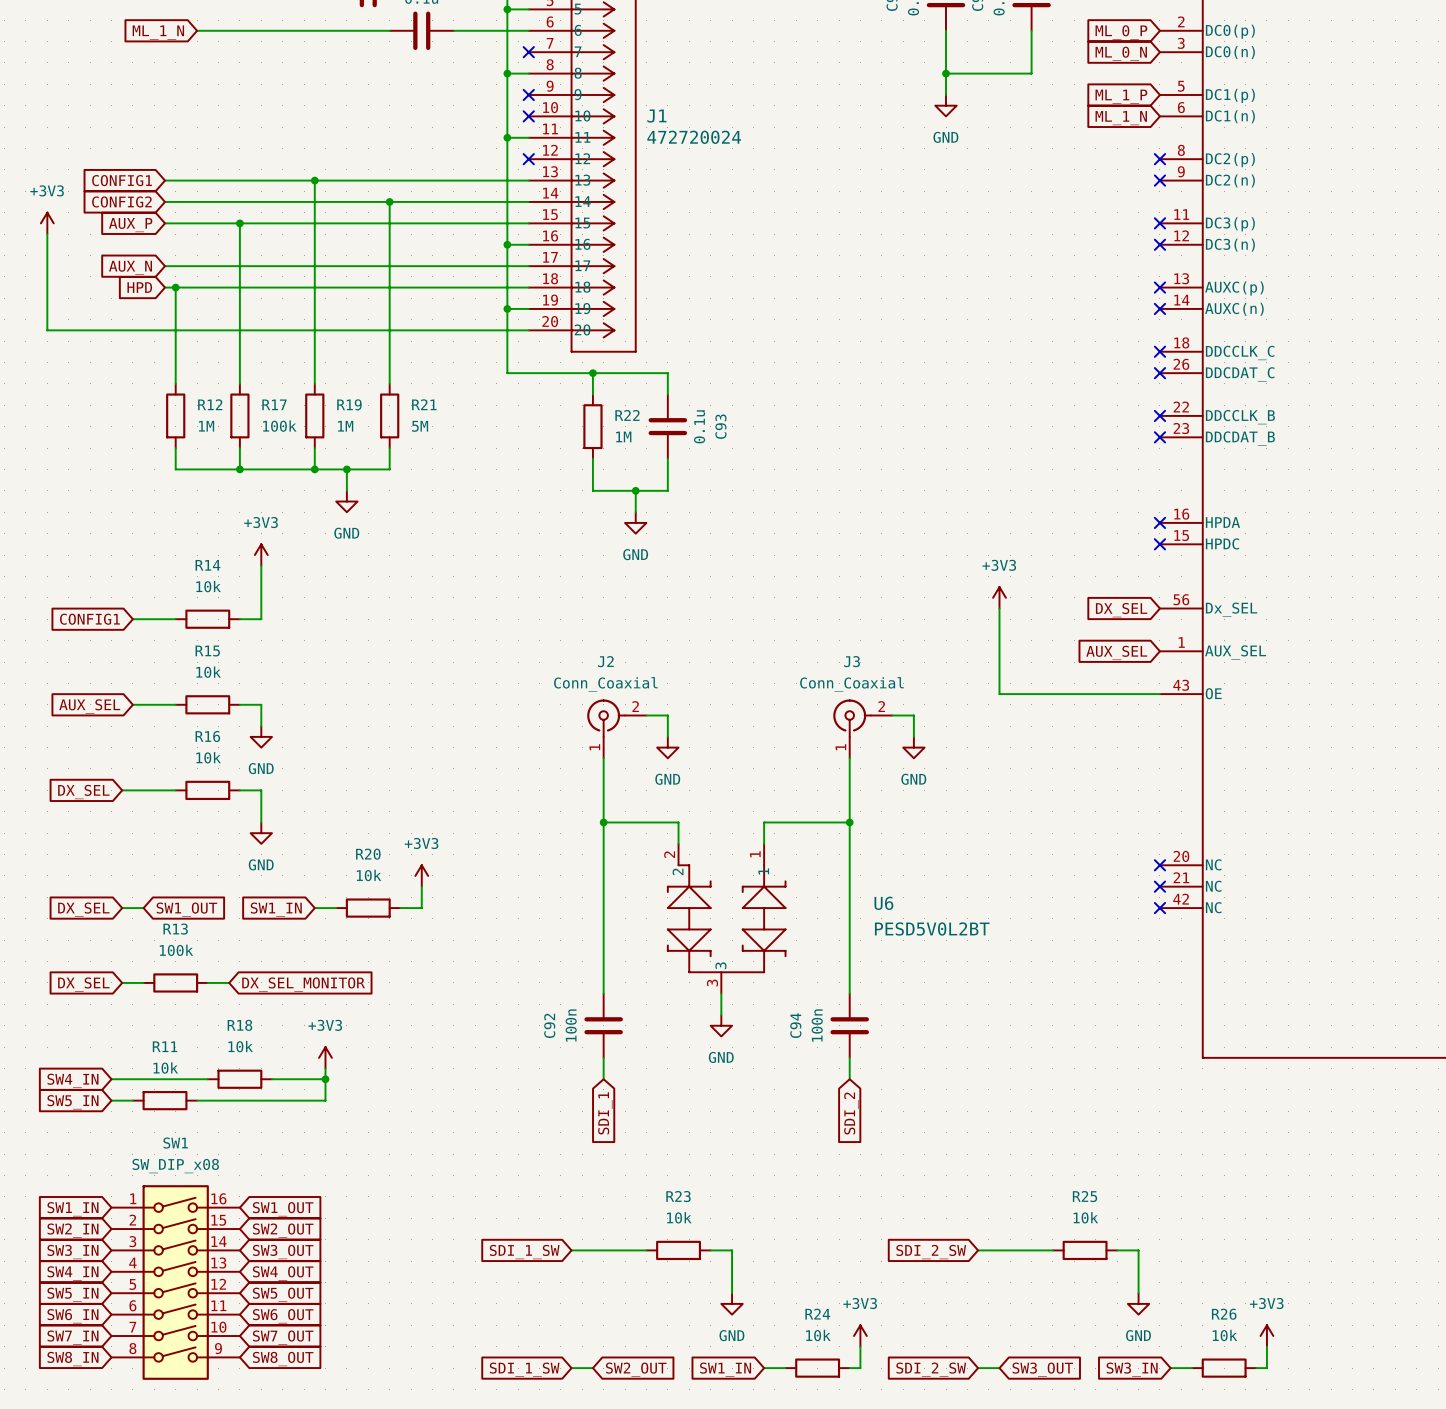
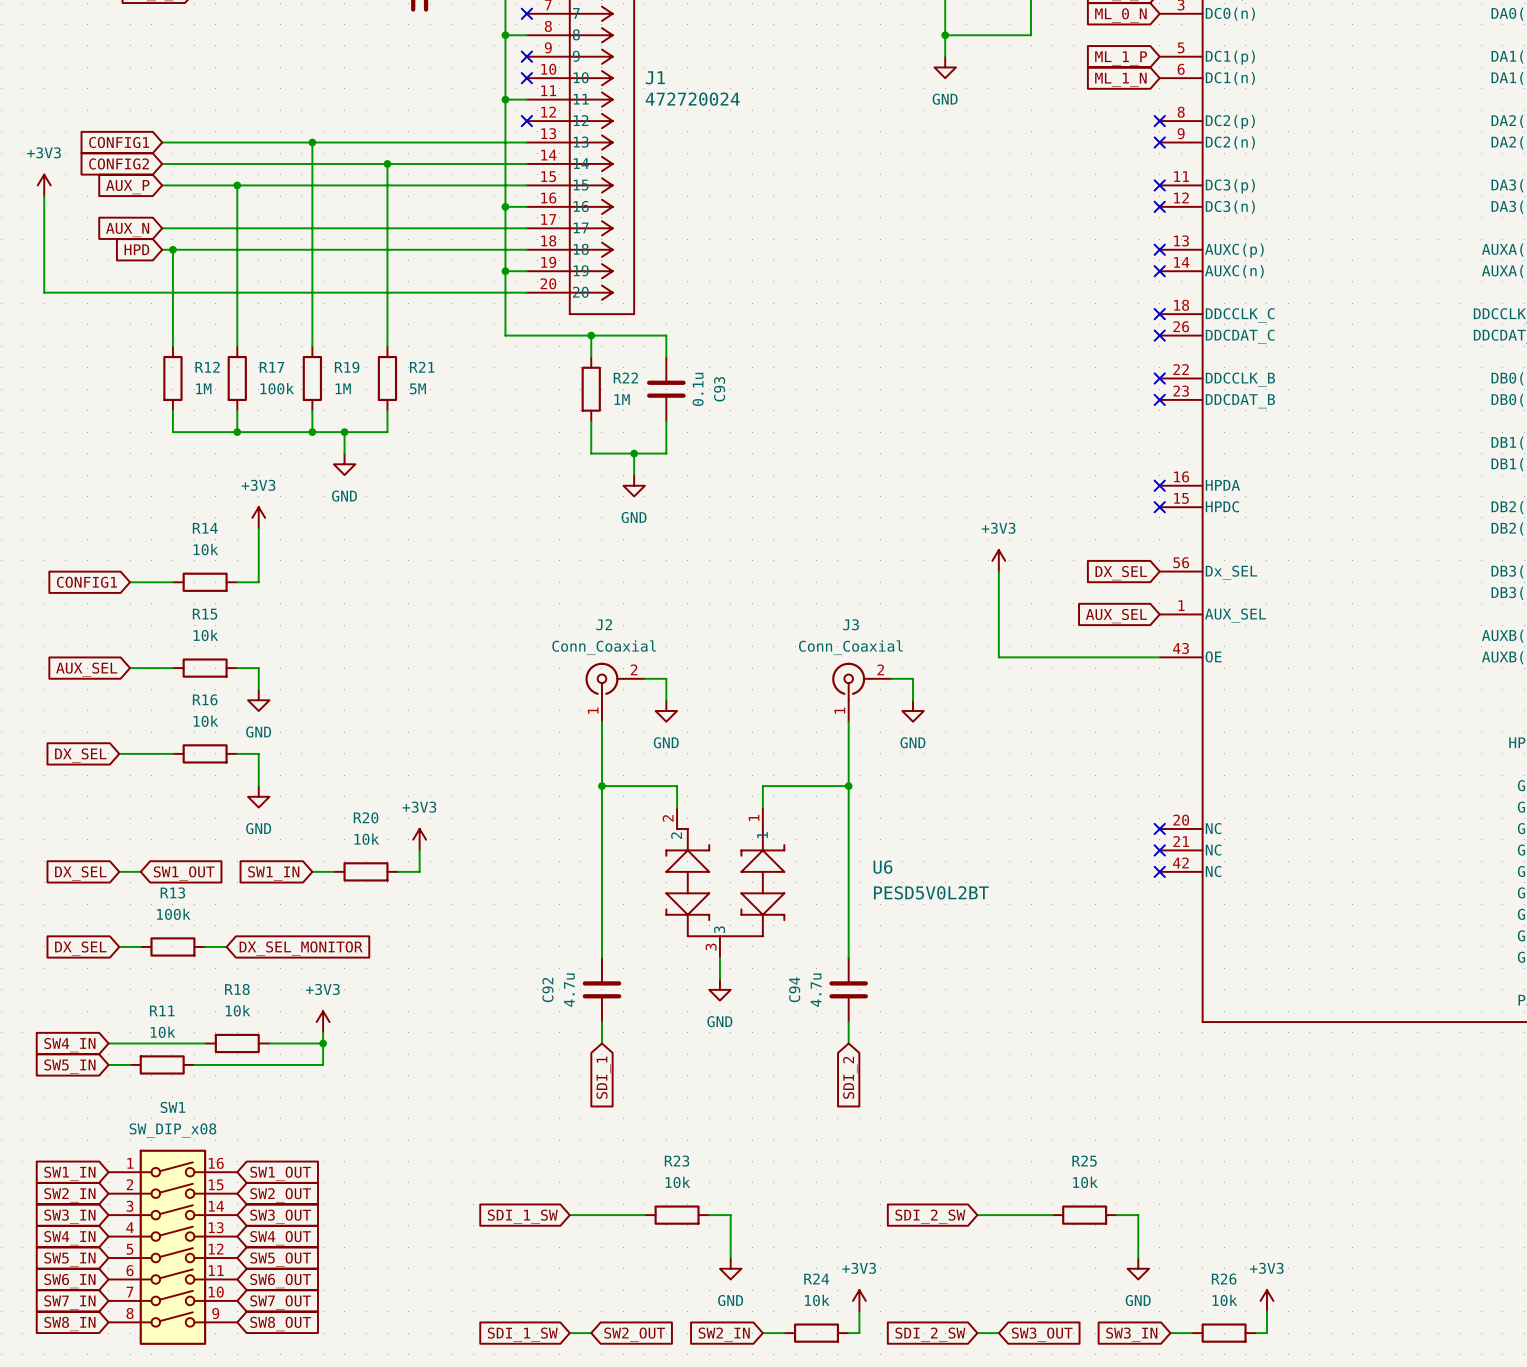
C92 value: 100n (571, 1025) -> 4.7u (569, 990)
C94 value: 100n (817, 1025) -> 4.7u (816, 990)
global label: SW1_IN (725, 1369) -> SW2_IN (724, 1334)

